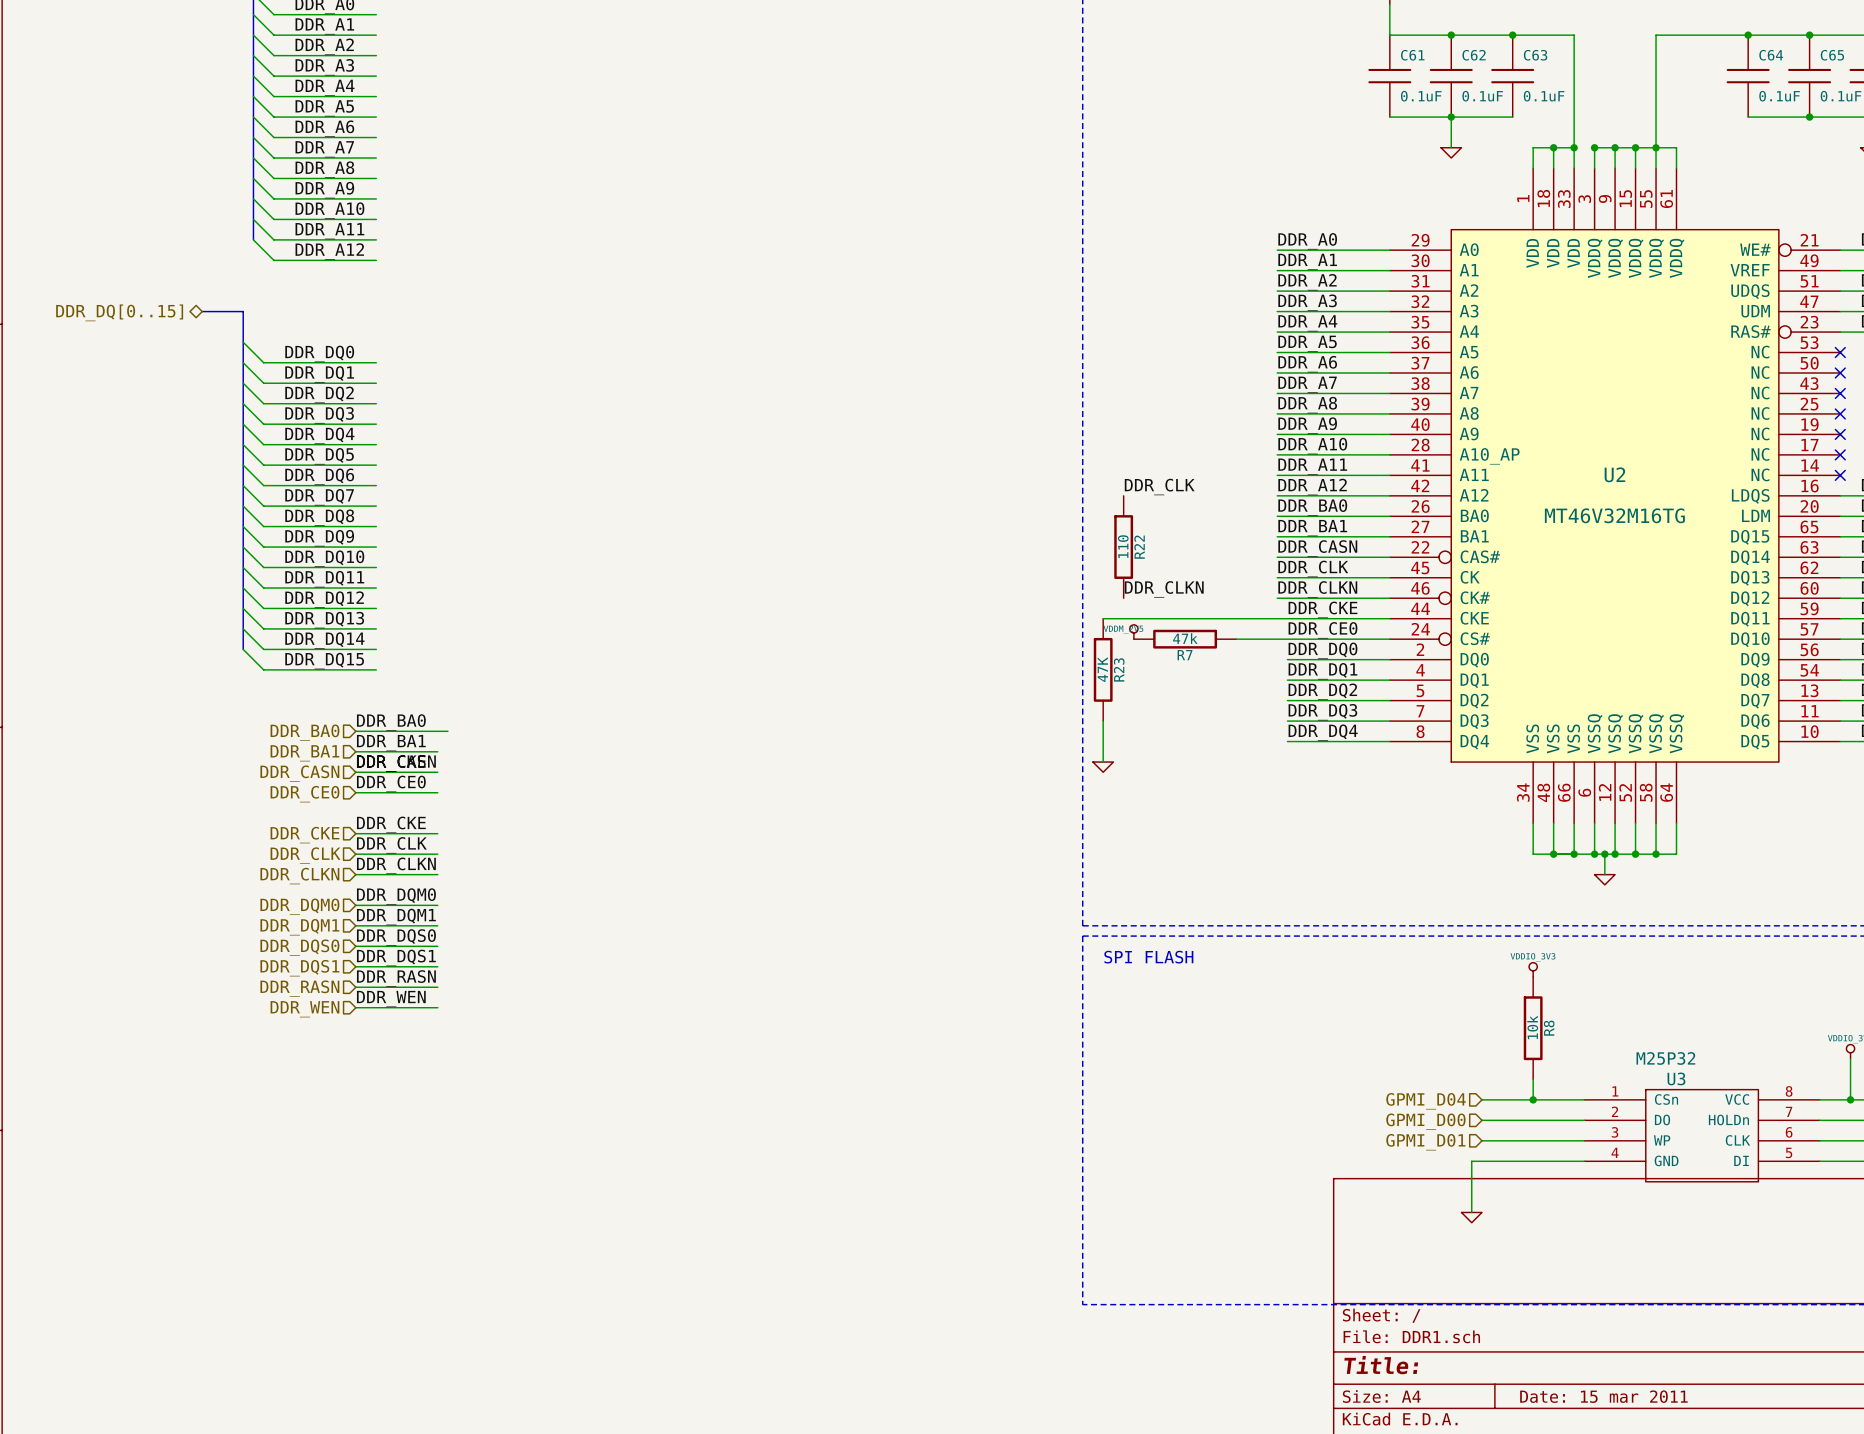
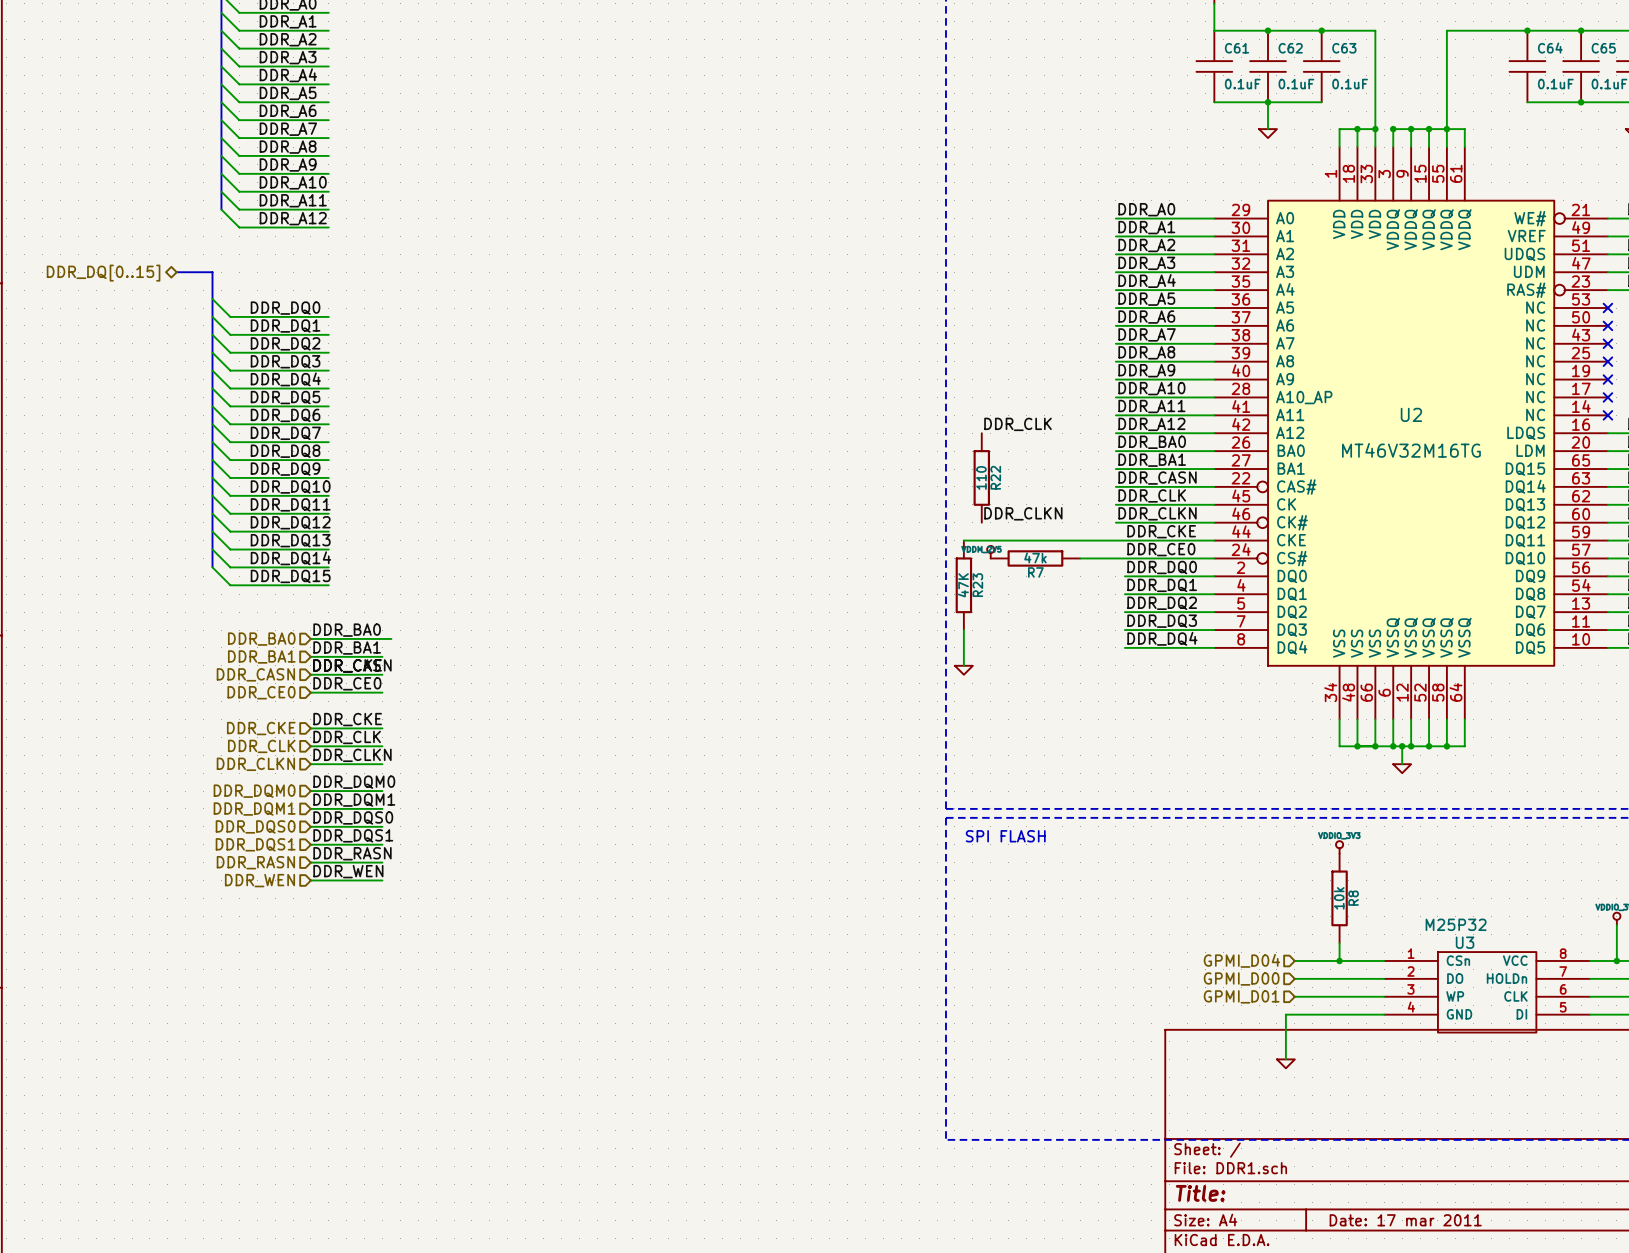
title block: Date: 15 mar 2011 (1603, 1396) -> Date: 17 mar 2011 (1405, 1220)

